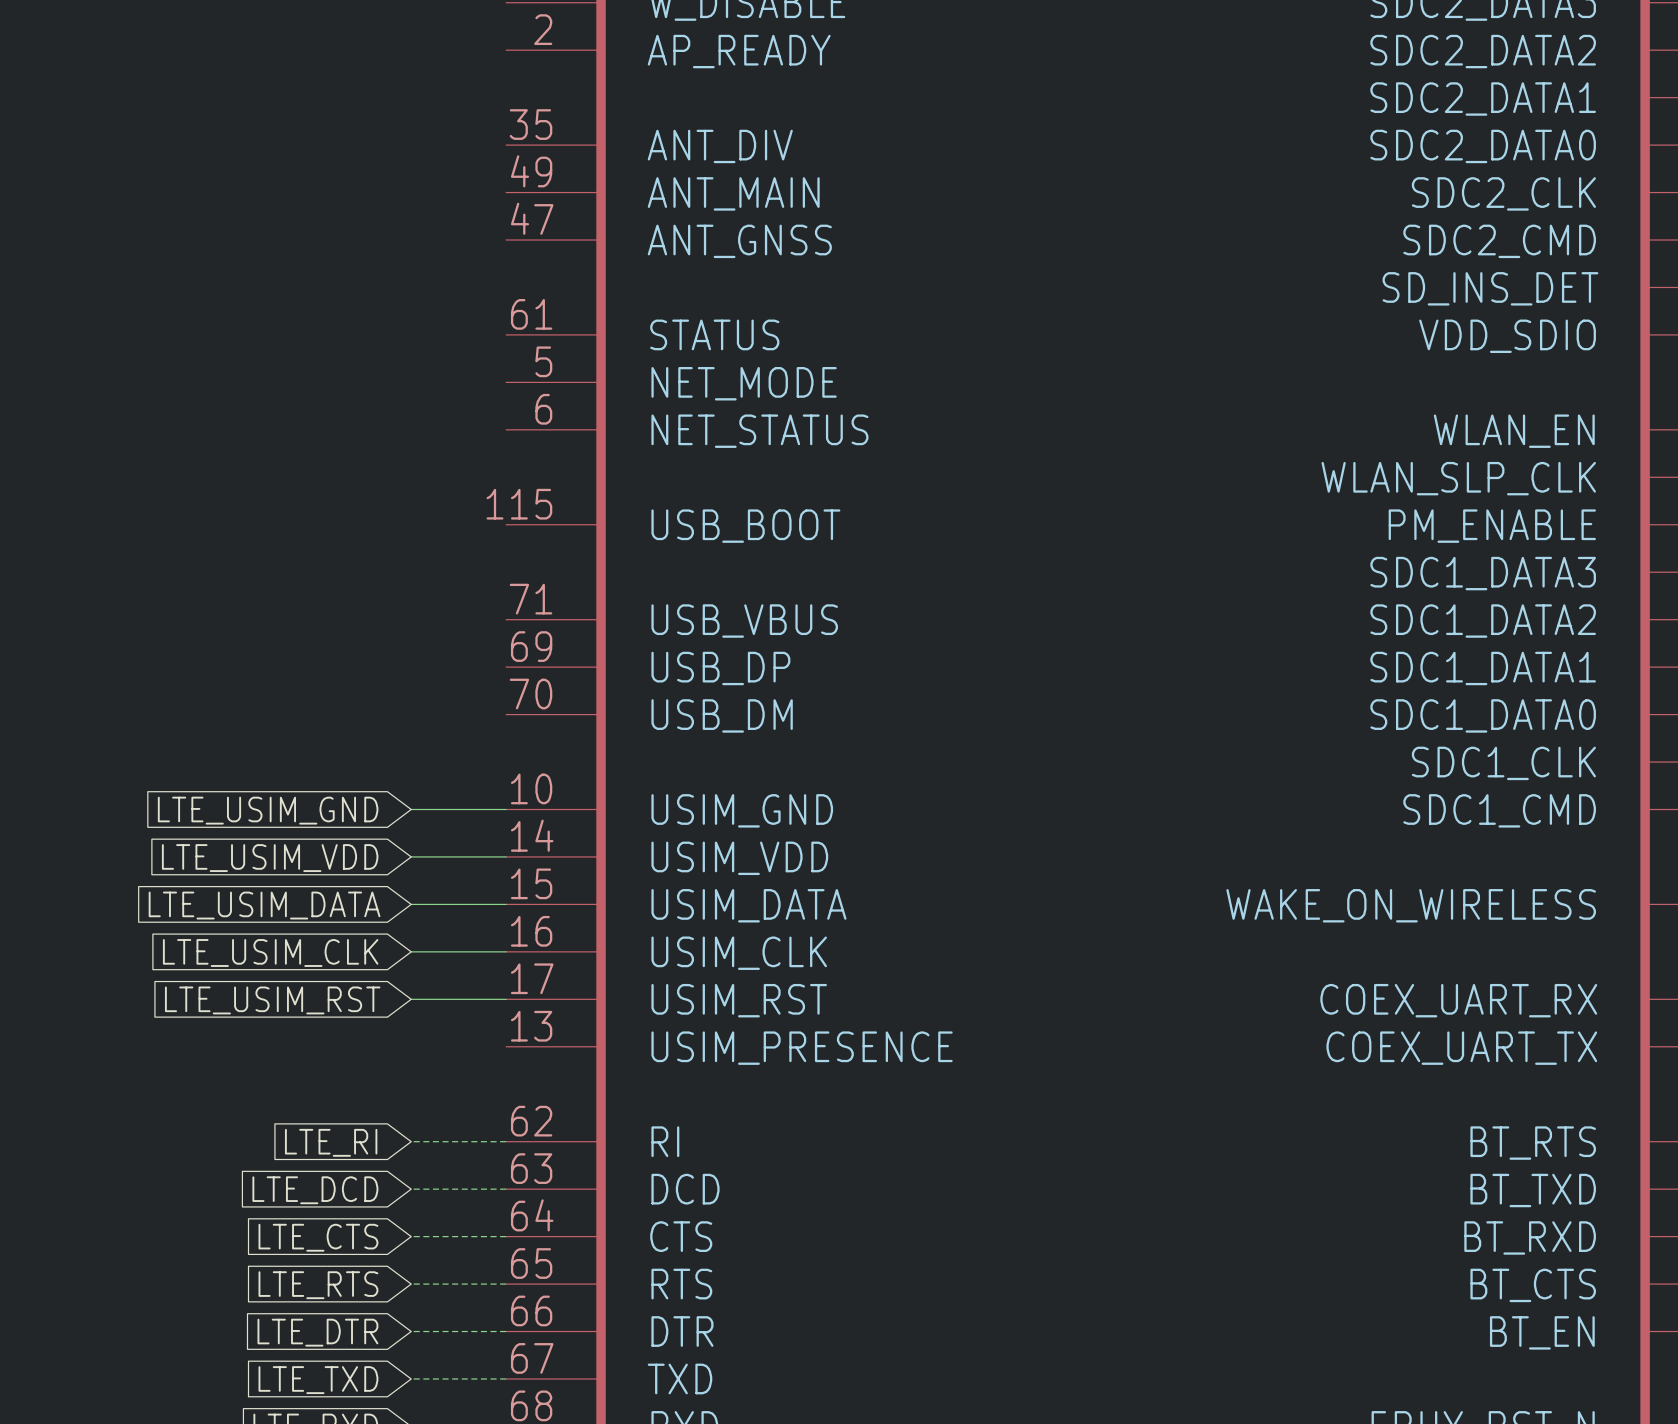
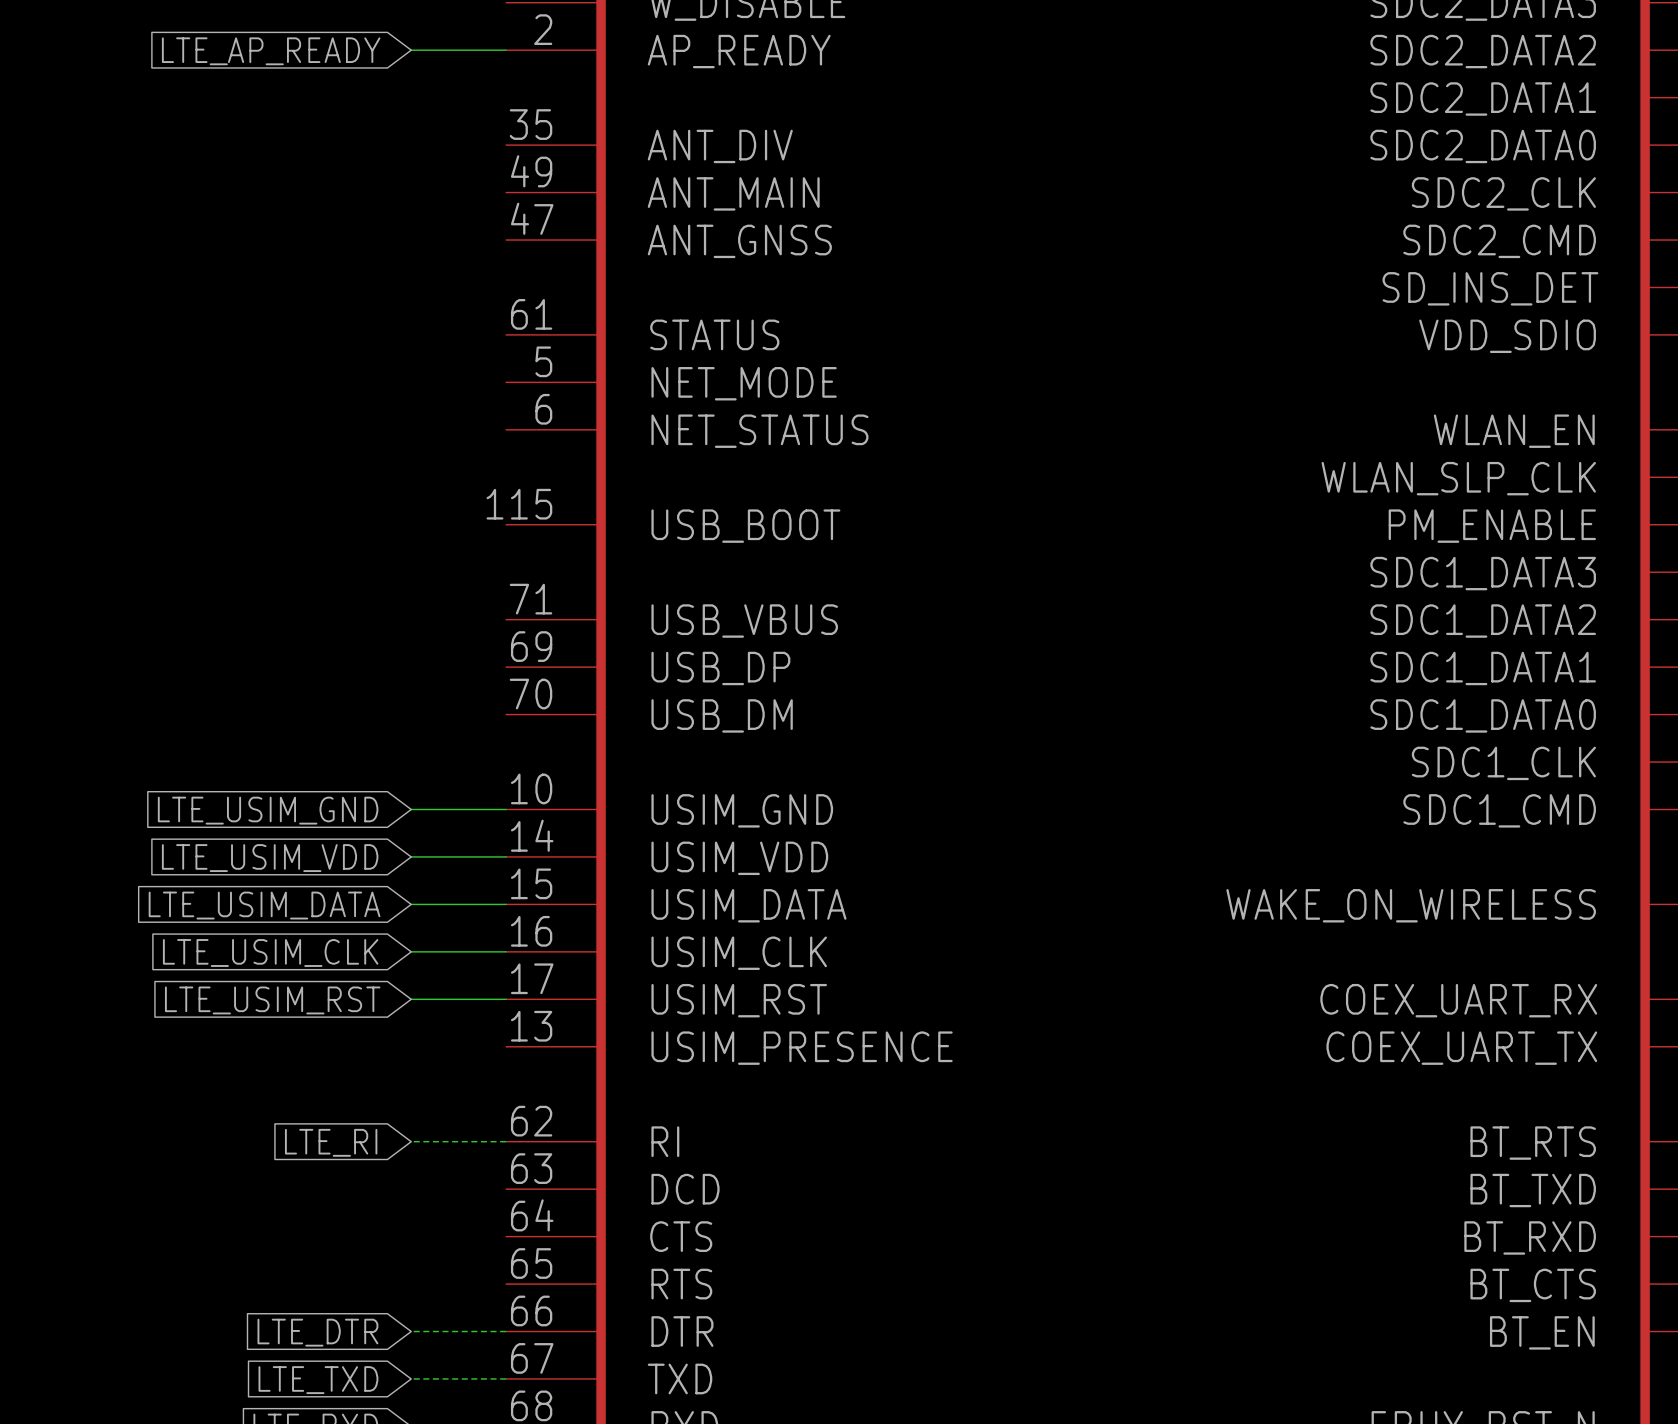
wire: none -> (411, 50) (506, 50)
global label: none -> LTE_AP_READY (271, 51)
wire: (411, 1189) (506, 1189) -> none
global label: LTE_DCD (315, 1190) -> none
wire: (411, 1236) (506, 1236) -> none
global label: LTE_CTS (318, 1237) -> none
wire: (411, 1284) (506, 1284) -> none
global label: LTE_RTS (318, 1285) -> none

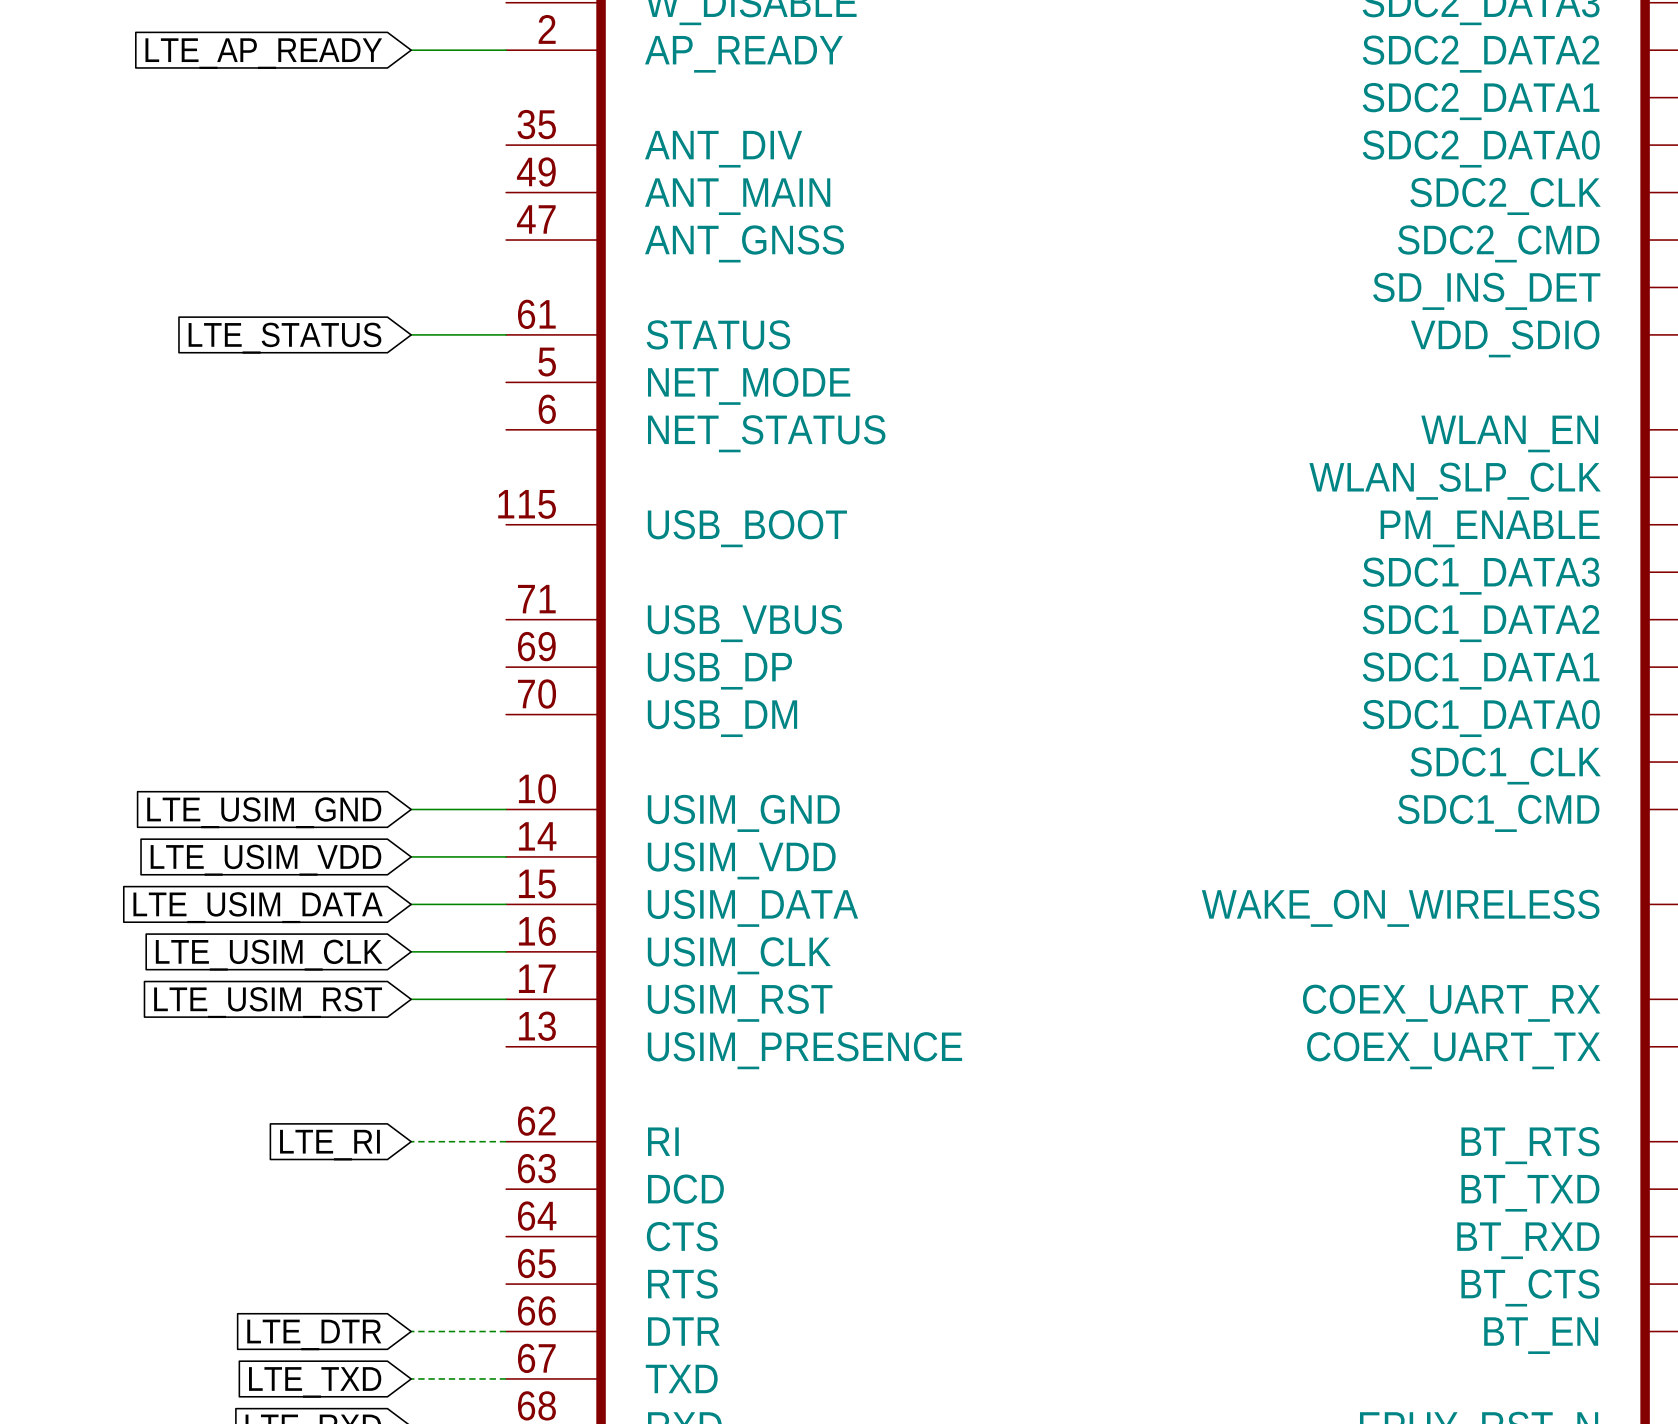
wire: none -> (411, 334) (506, 334)
global label: none -> LTE_STATUS (284, 338)

